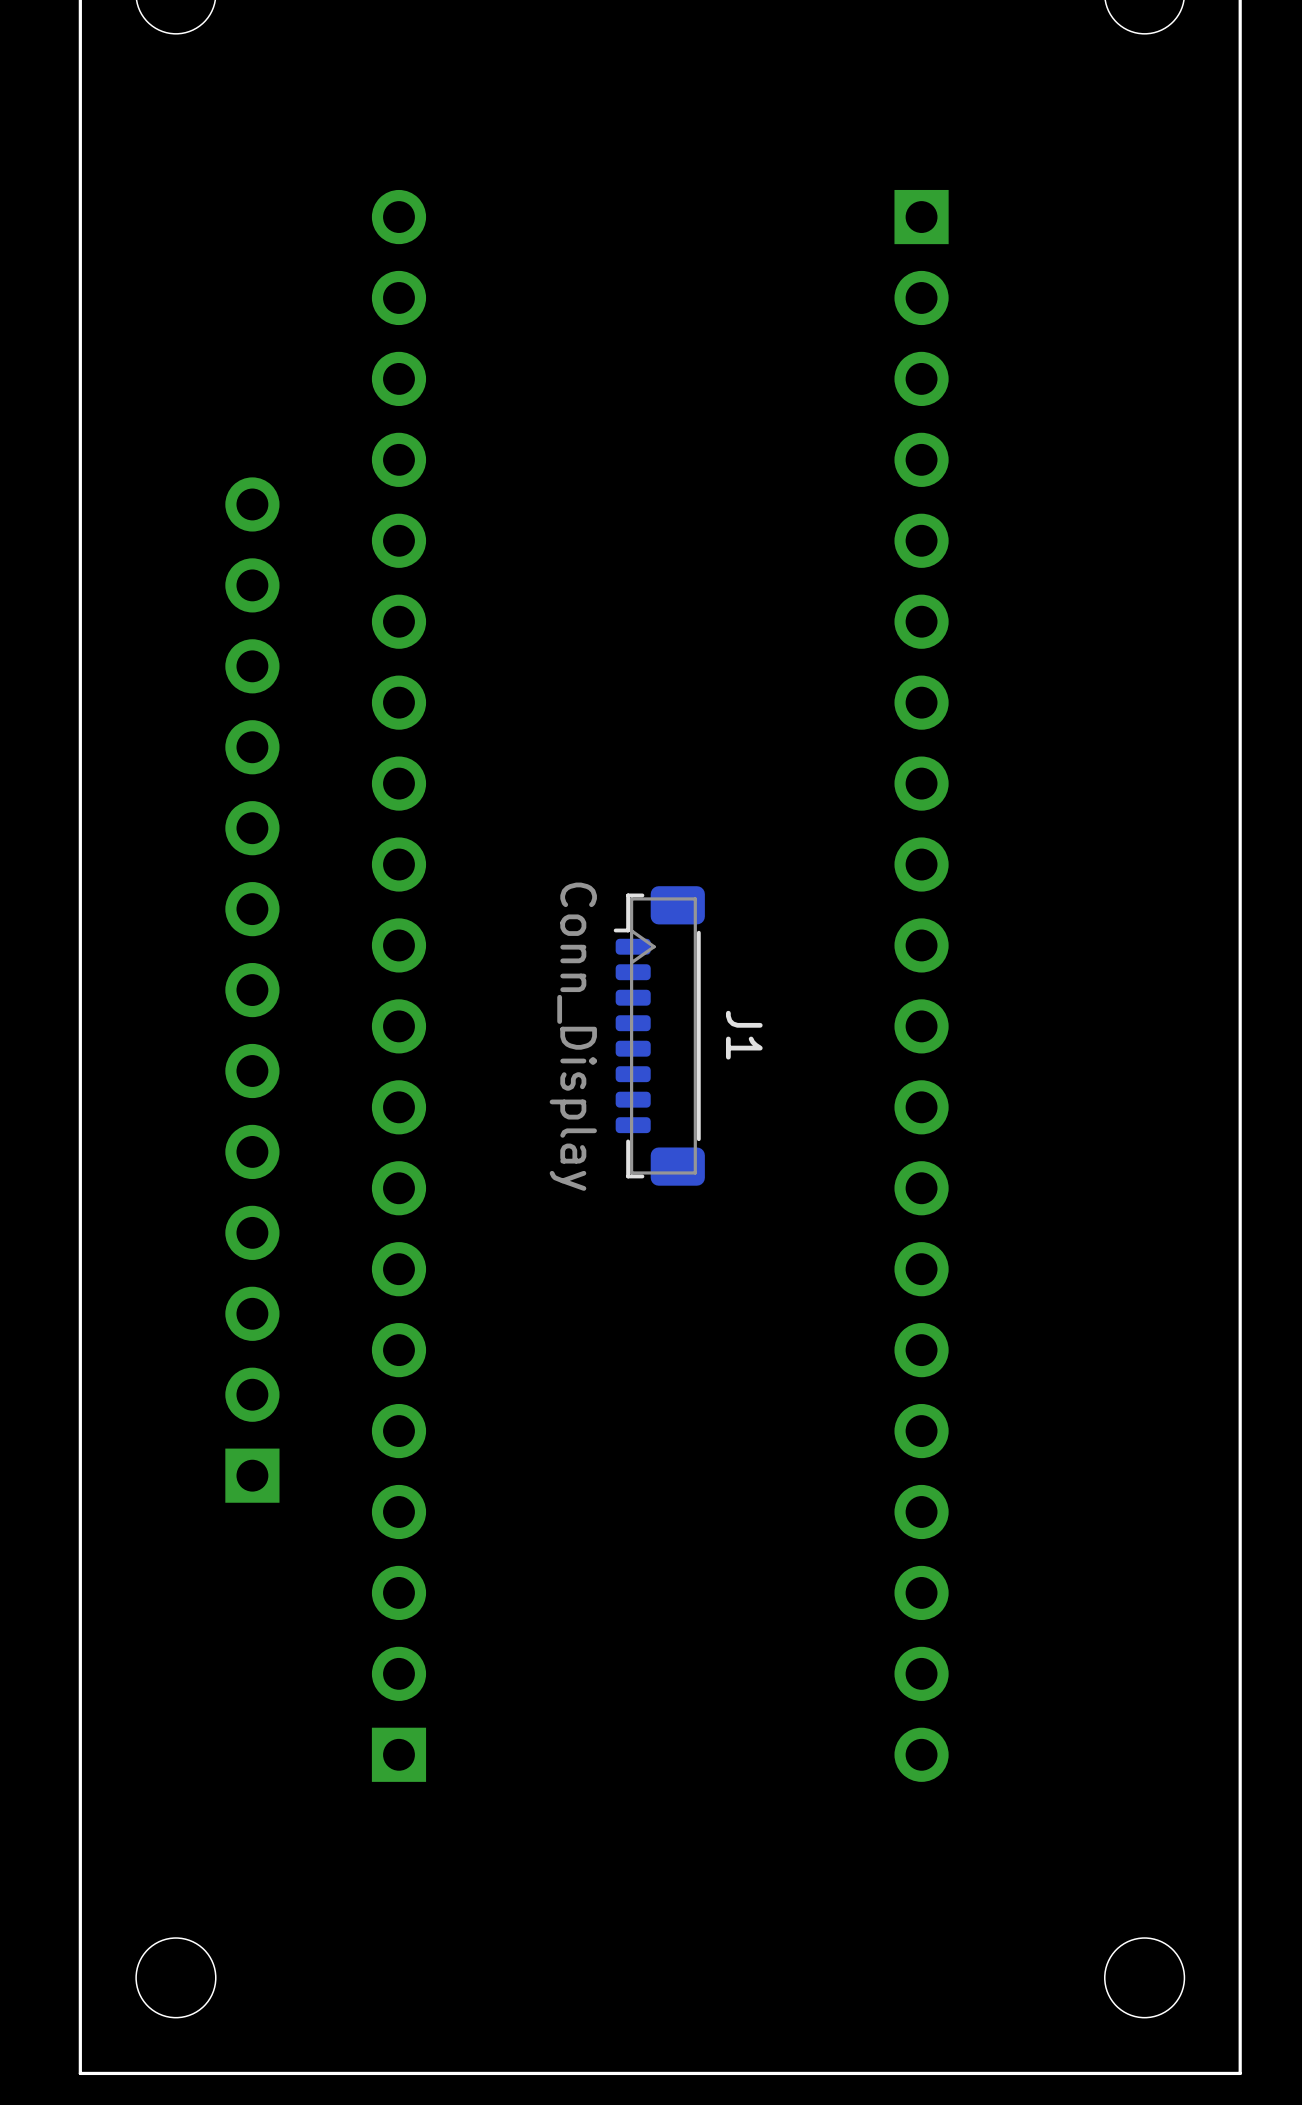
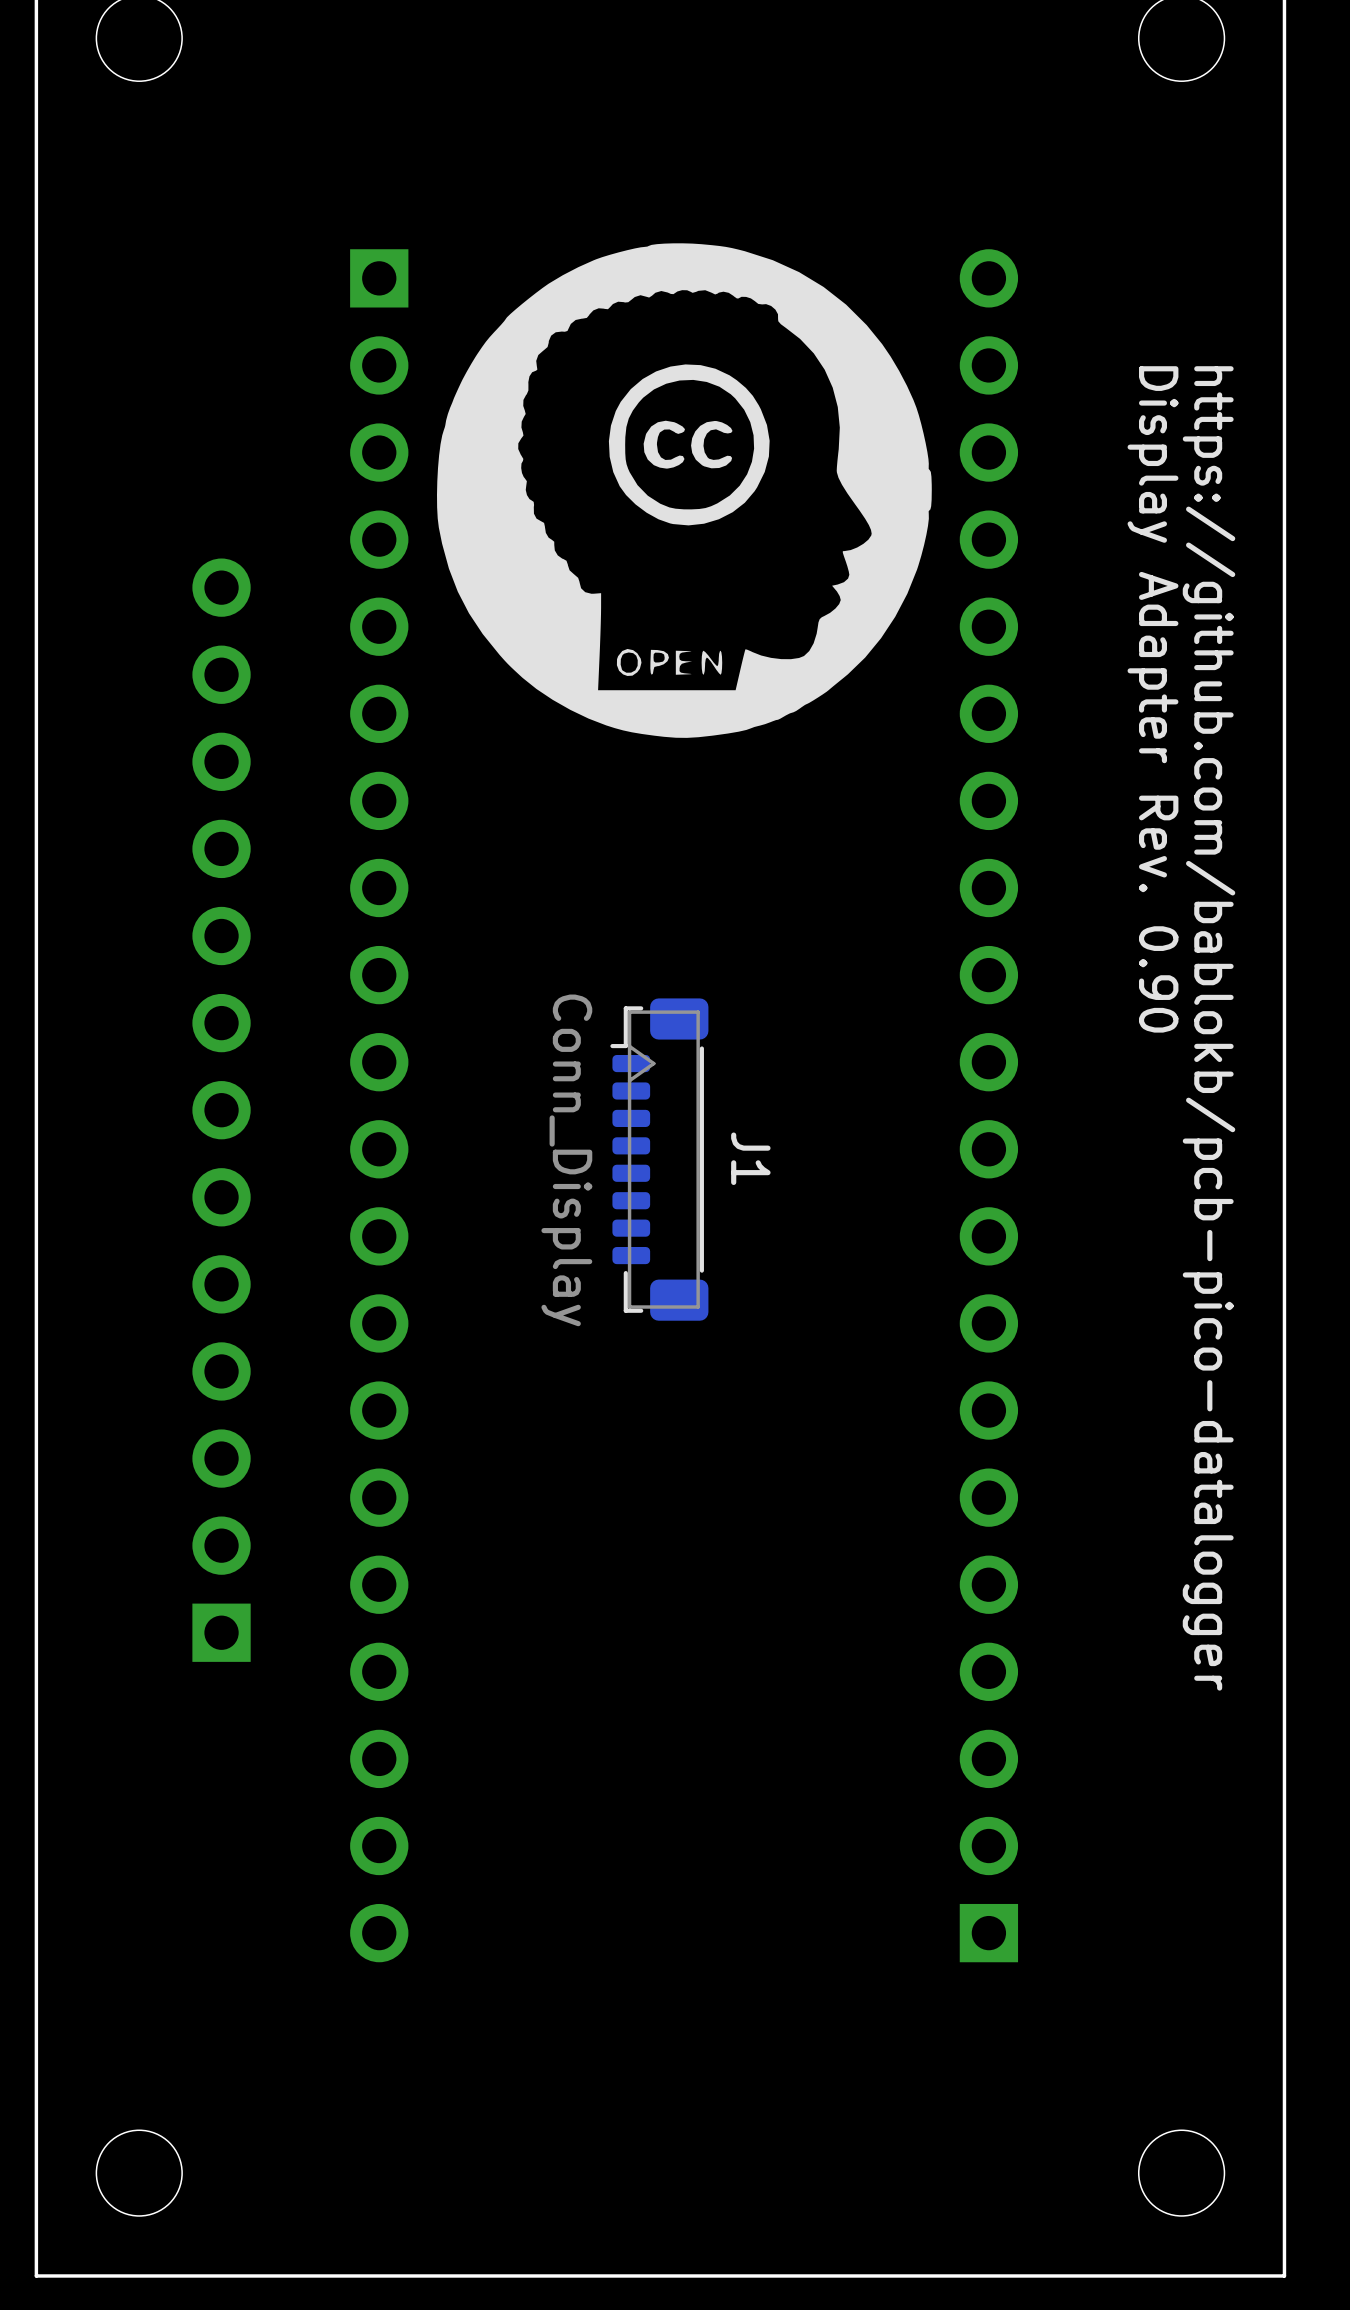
drawing: none -> [436, 243, 932, 738]
text: none -> Display Adapter Rev. 0.90 (1152, 699)
text: none -> https://github.com/bablokb/pcb-pico-datalogger (1209, 1028)
part rotation: 0° (398, 985) -> 180° (379, 1105)
part rotation: 0° (921, 985) -> 180° (988, 1105)

